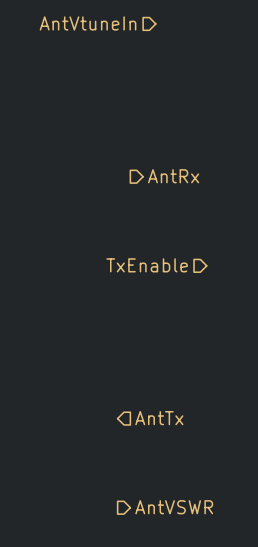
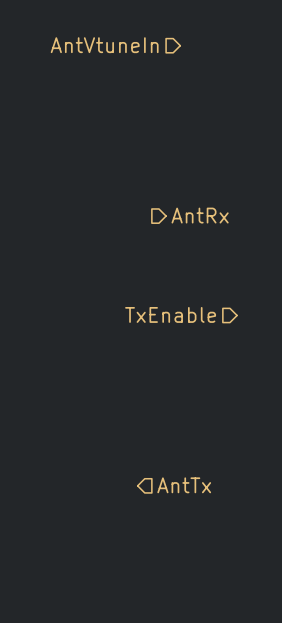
hierarchical label: AntVSWR (174, 507) -> none

